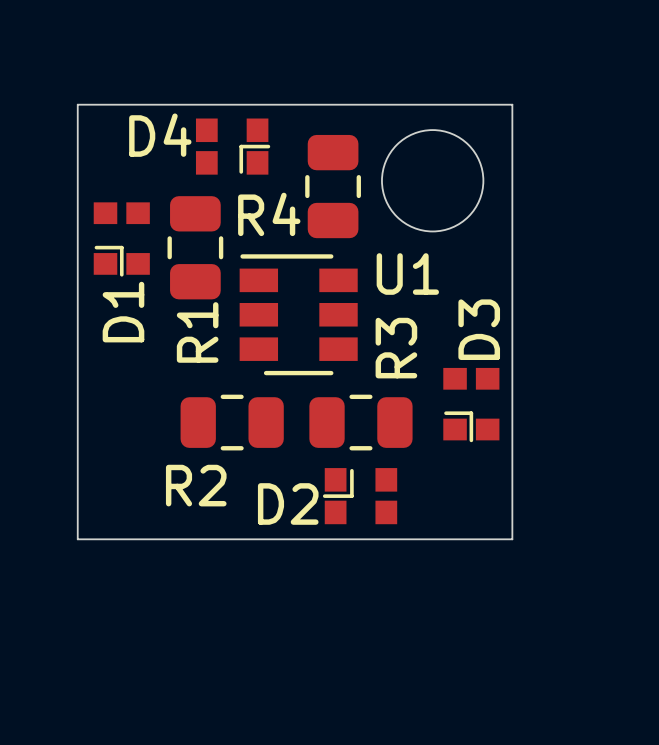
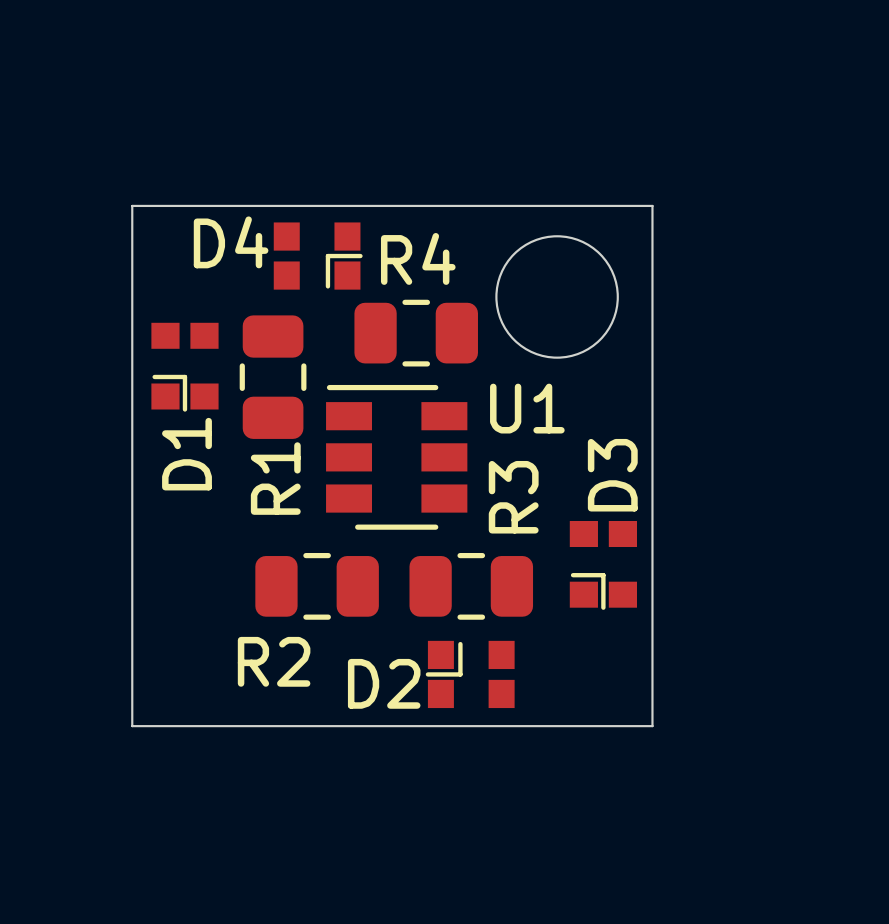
R4 rotation: 0° (333, 186) -> 90° clockwise (416, 333)

